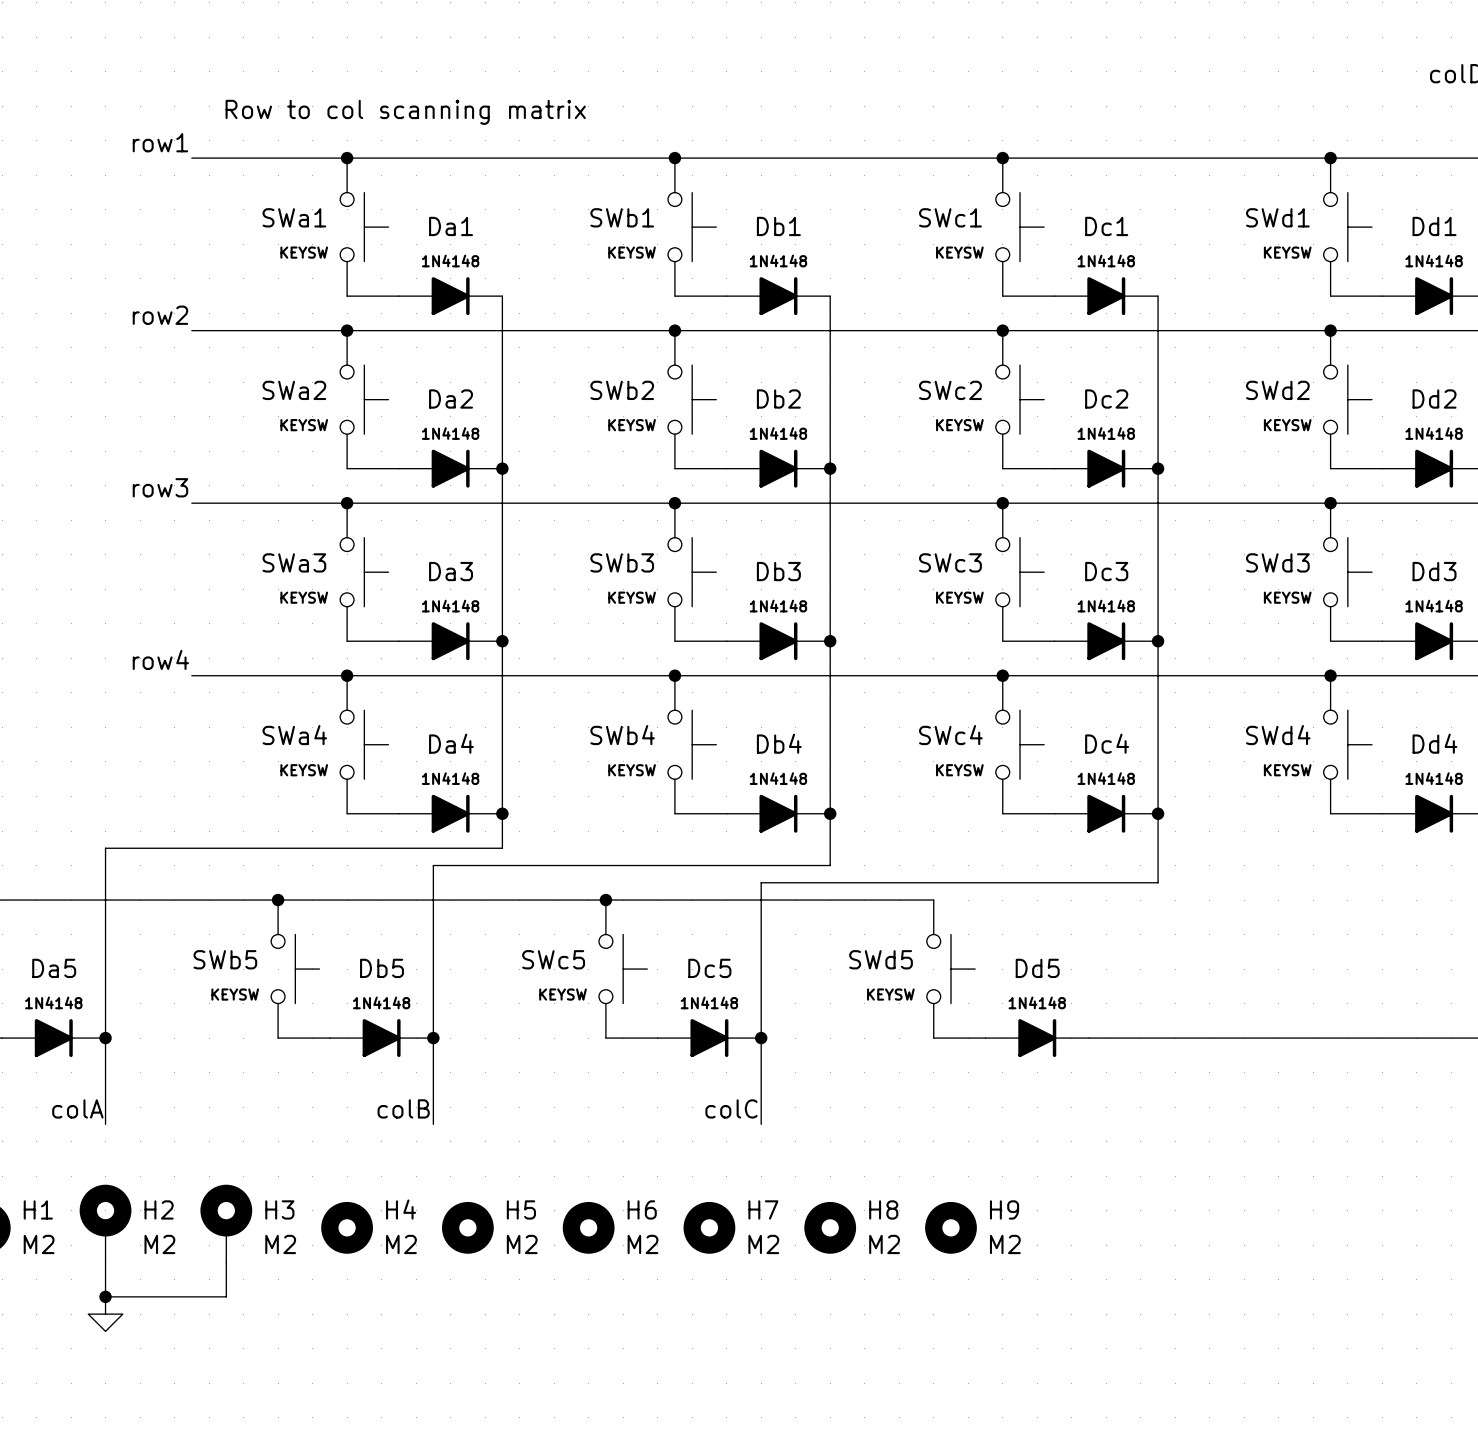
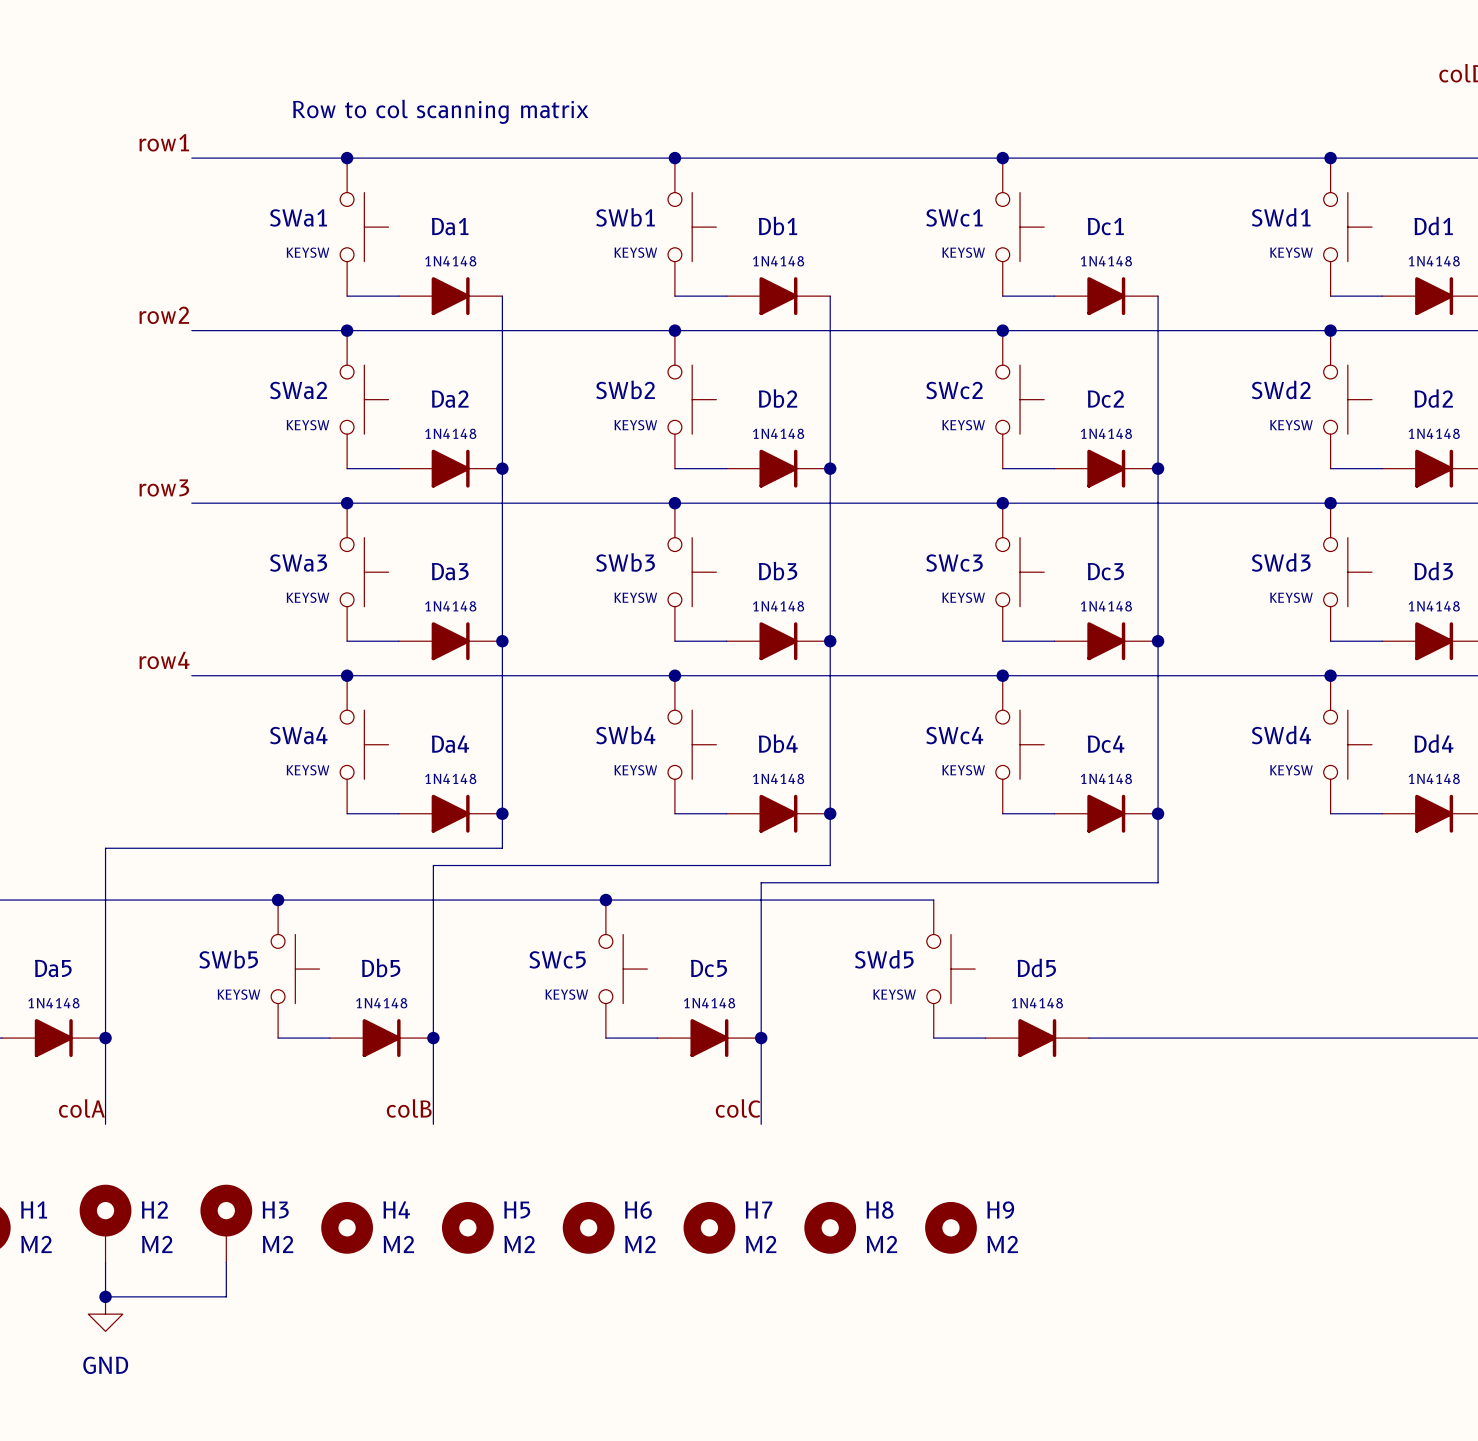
power symbol text: none -> GND (105, 1365)

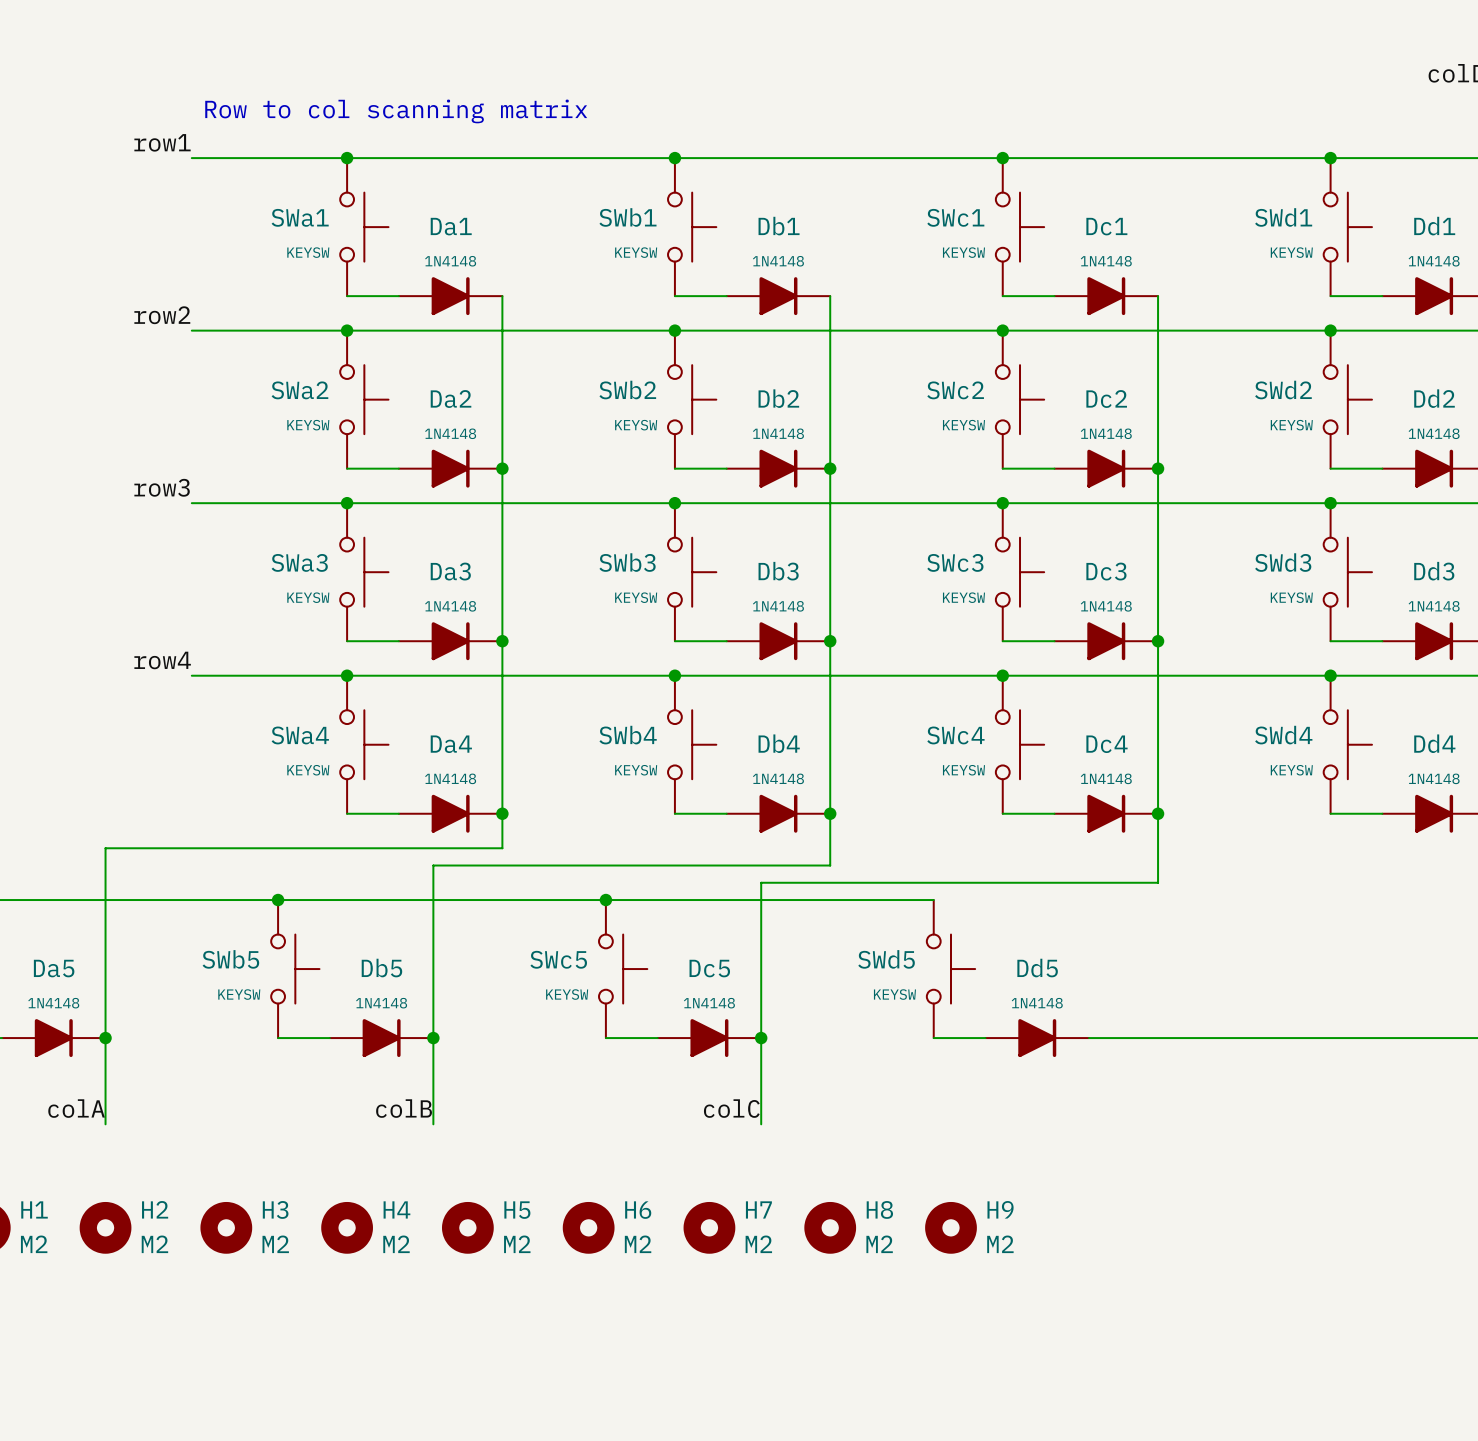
H2 symbol: [79, 1184, 132, 1263] -> [79, 1201, 132, 1254]
H3 symbol: [200, 1184, 253, 1263] -> [200, 1201, 253, 1254]
wire: (105, 1262) (105, 1296) (226, 1296) (226, 1262) -> none
junction: (105, 1296) -> none
power symbol: GND (105, 1314) -> none

